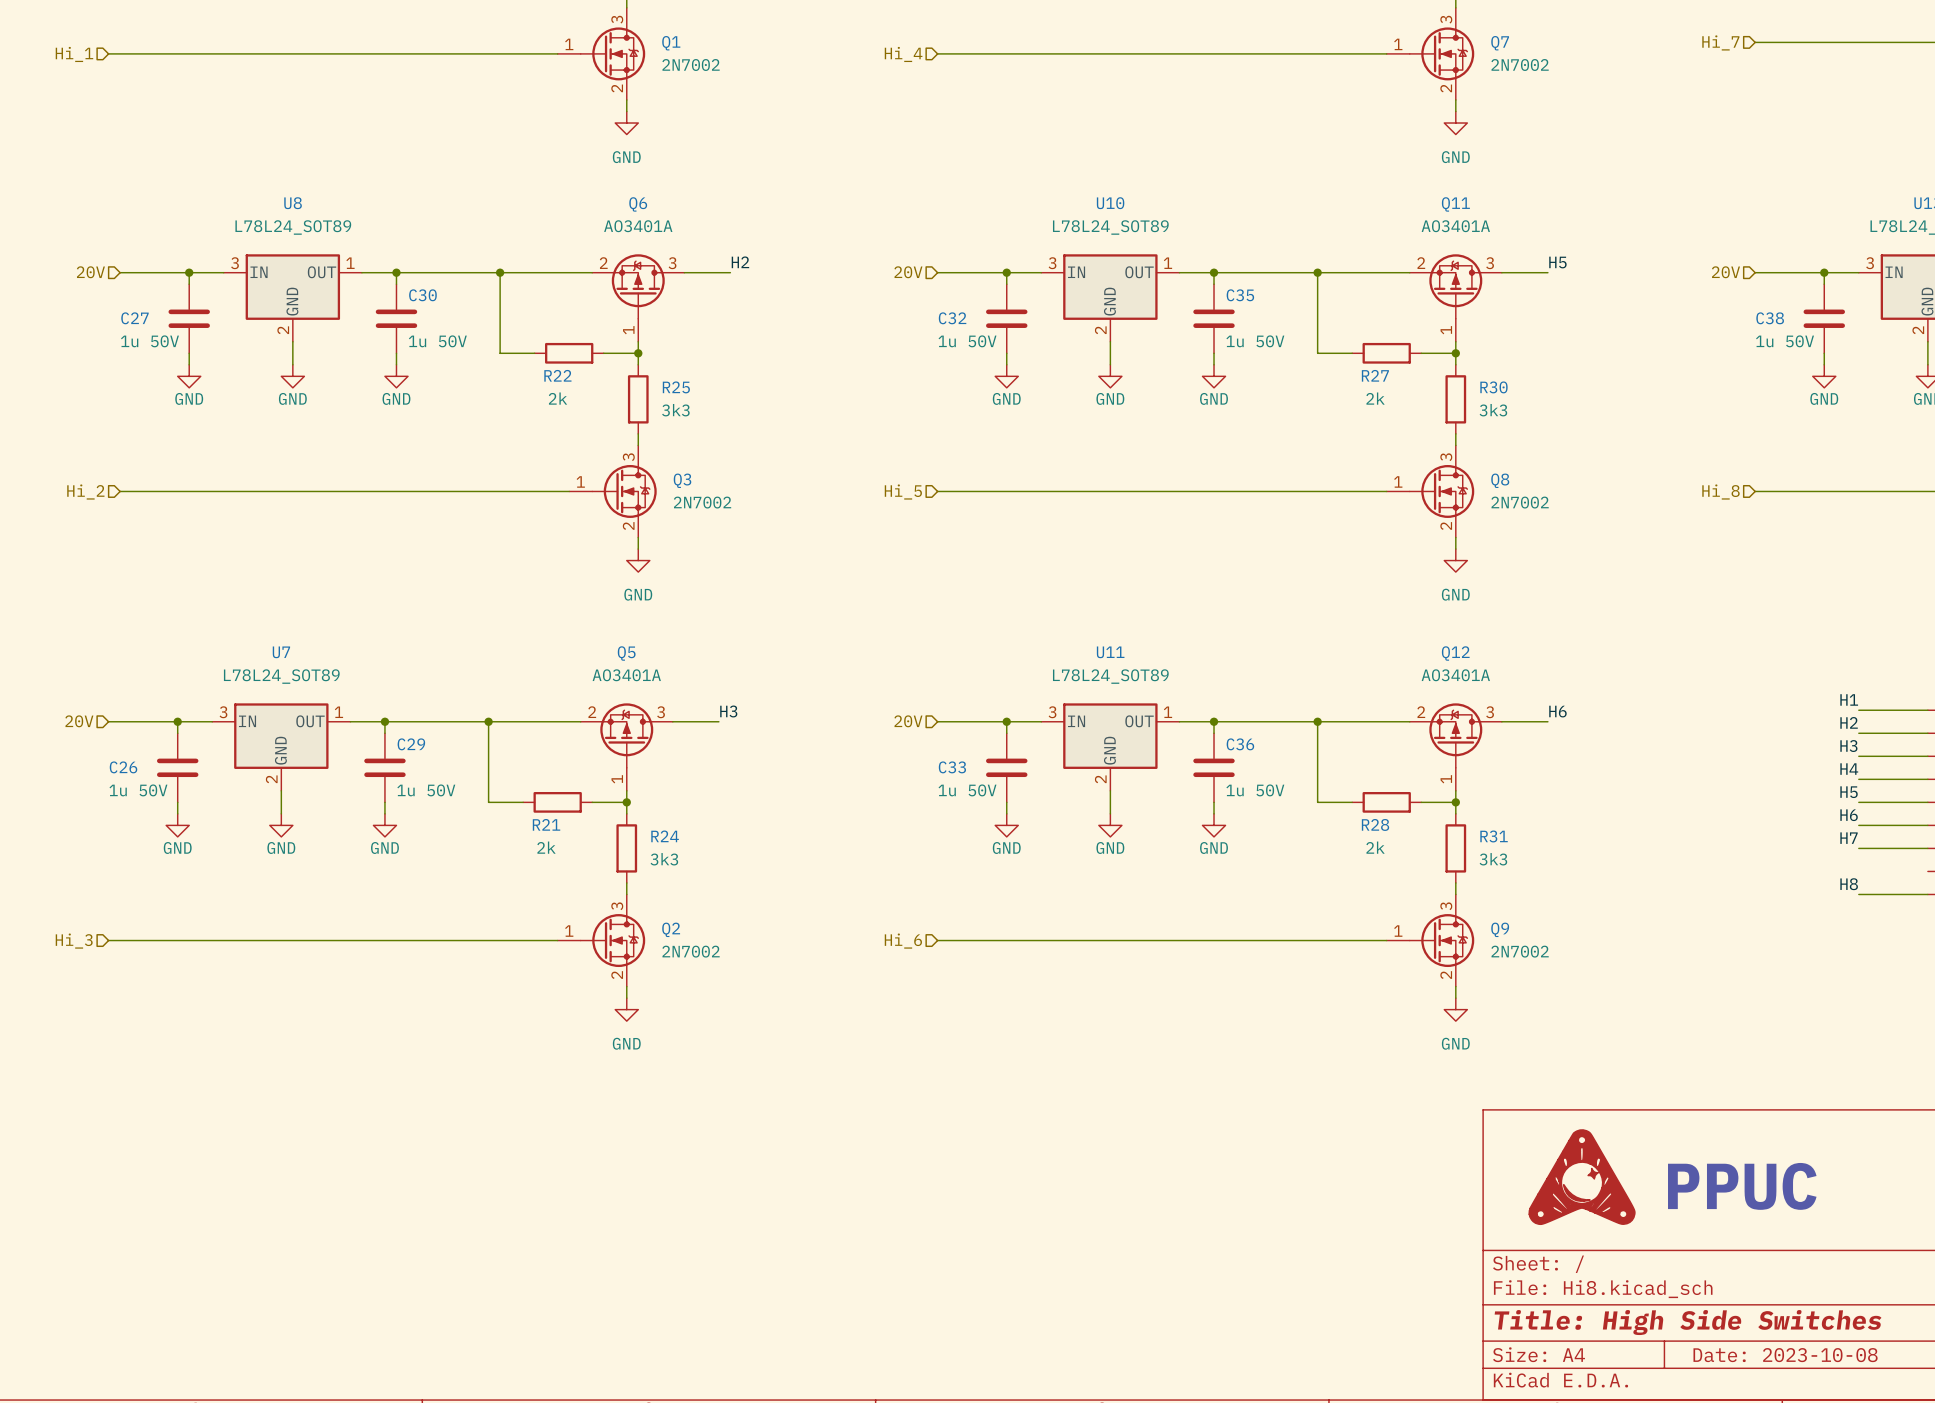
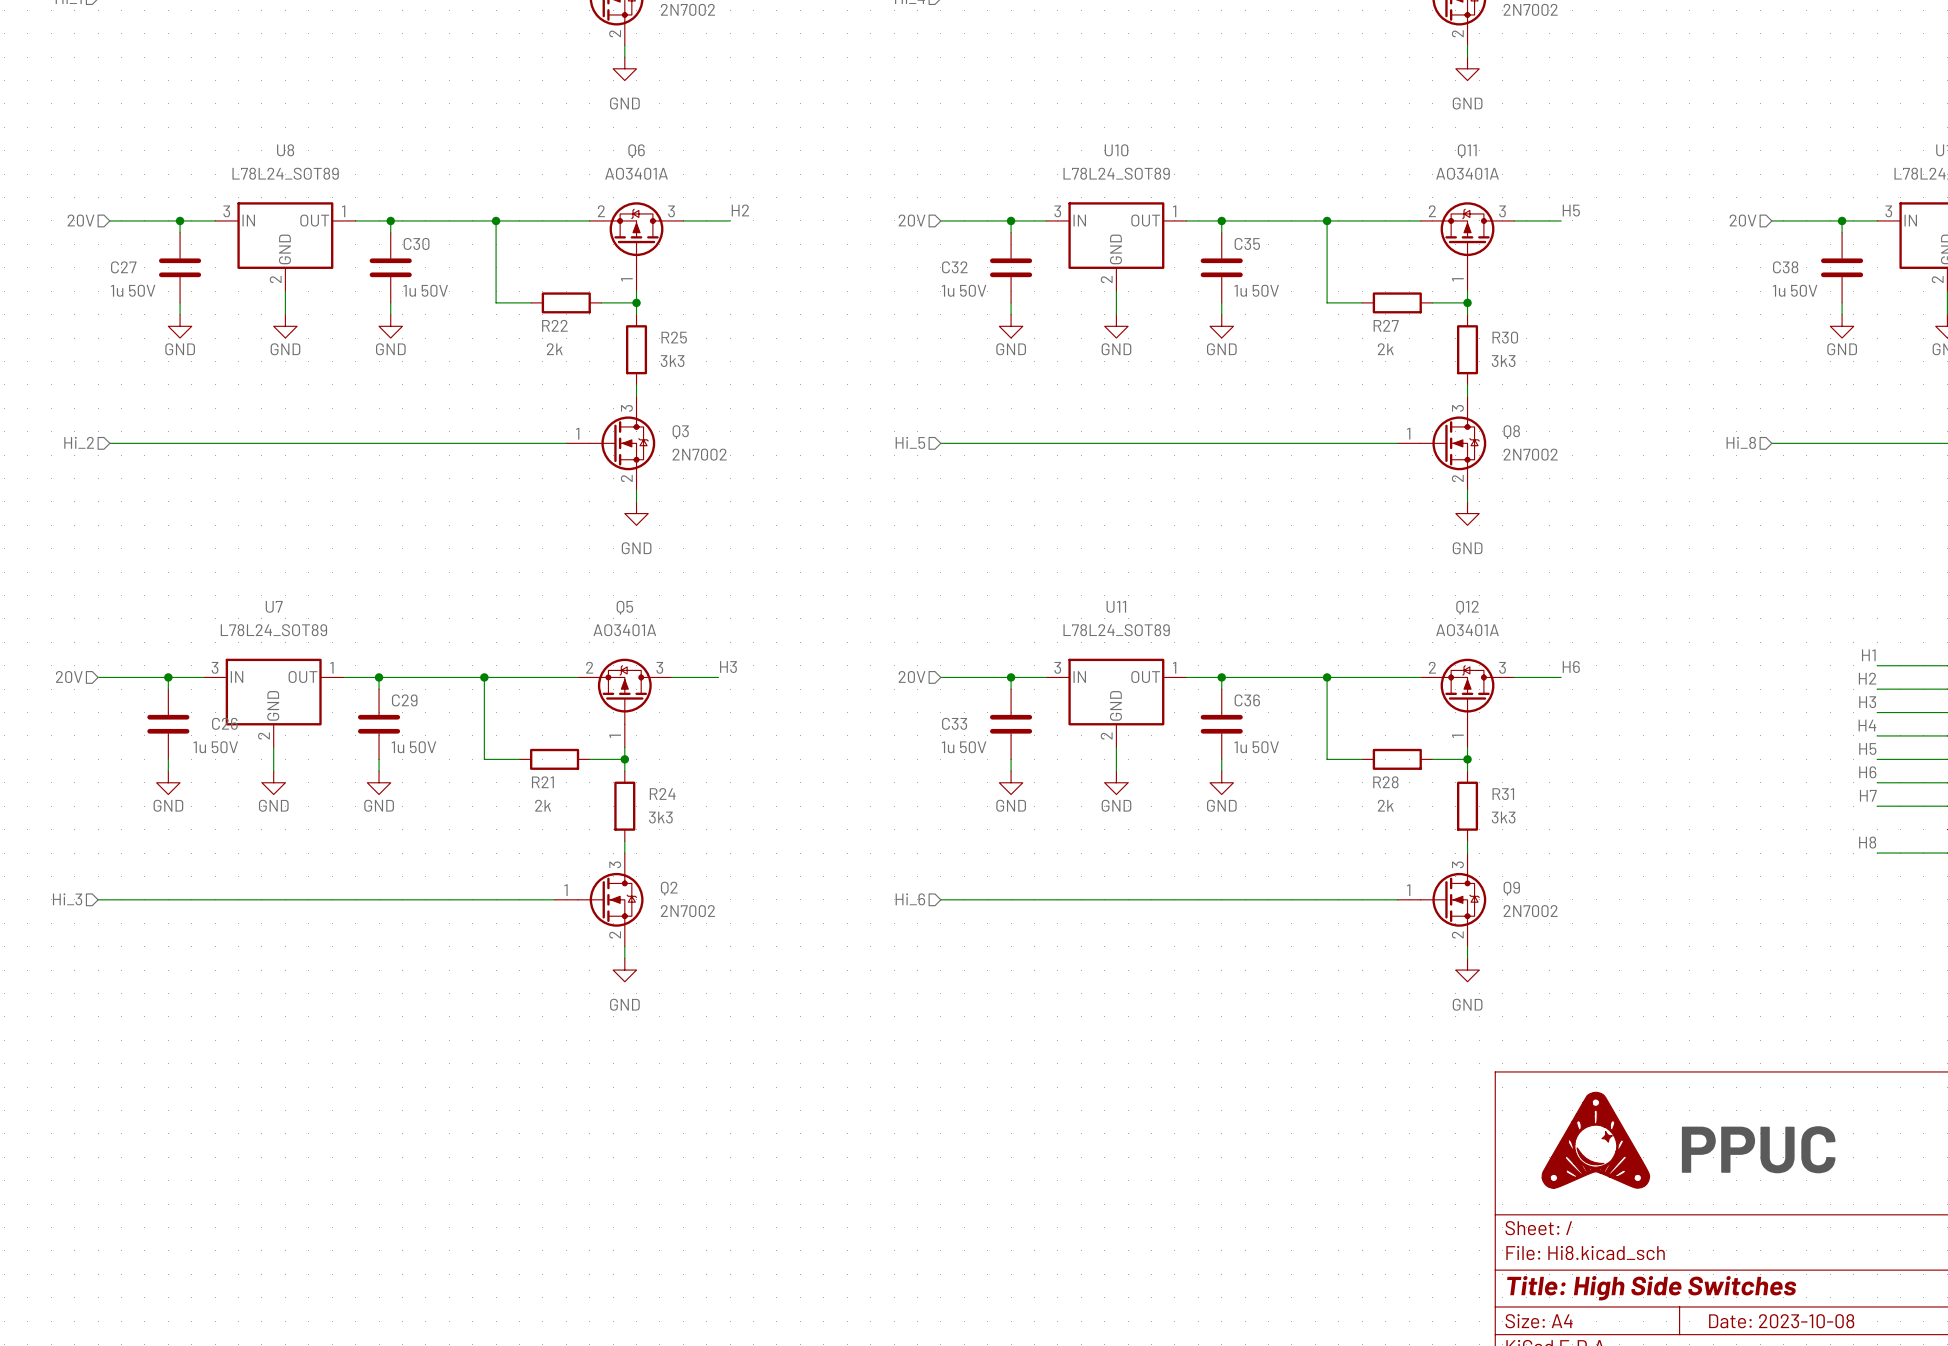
C26 name position: C26 (123, 767) -> C26 (224, 723)
C26 value position: 1u 50V (138, 790) -> 1u 50V (215, 747)

